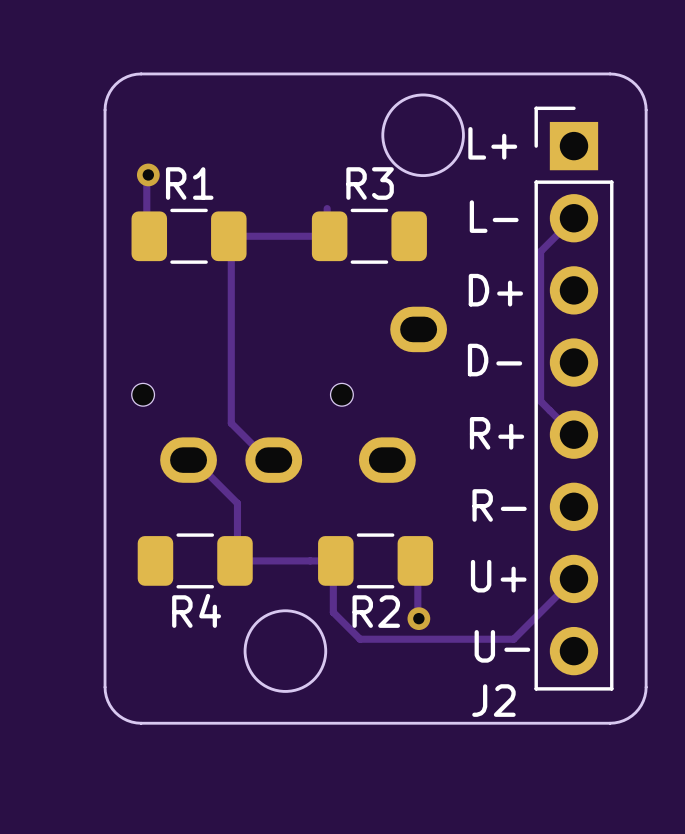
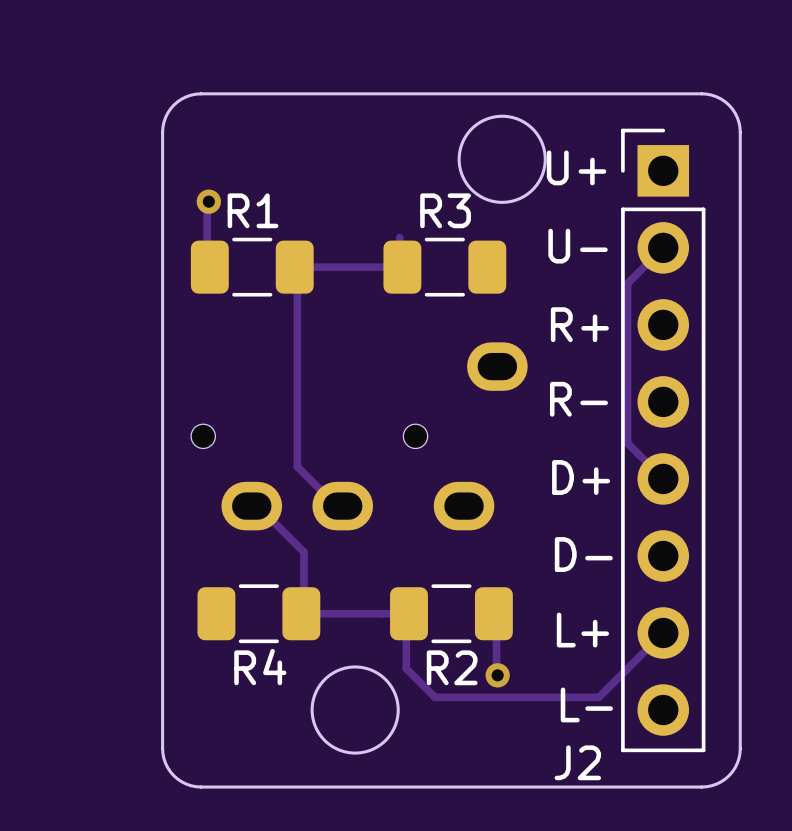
J2 text: L+ (492, 143) -> U+ (576, 167)
J2 text: L- (494, 216) -> U- (578, 246)
J2 text: D+ (495, 290) -> R+ (579, 324)
J2 text: D- (495, 360) -> R- (578, 399)
J2 text: R+ (497, 433) -> D+ (581, 477)
J2 text: R- (499, 505) -> D- (583, 554)
J2 text: U+ (498, 576) -> L+ (582, 630)
J2 text: U- (502, 646) -> L- (586, 704)

